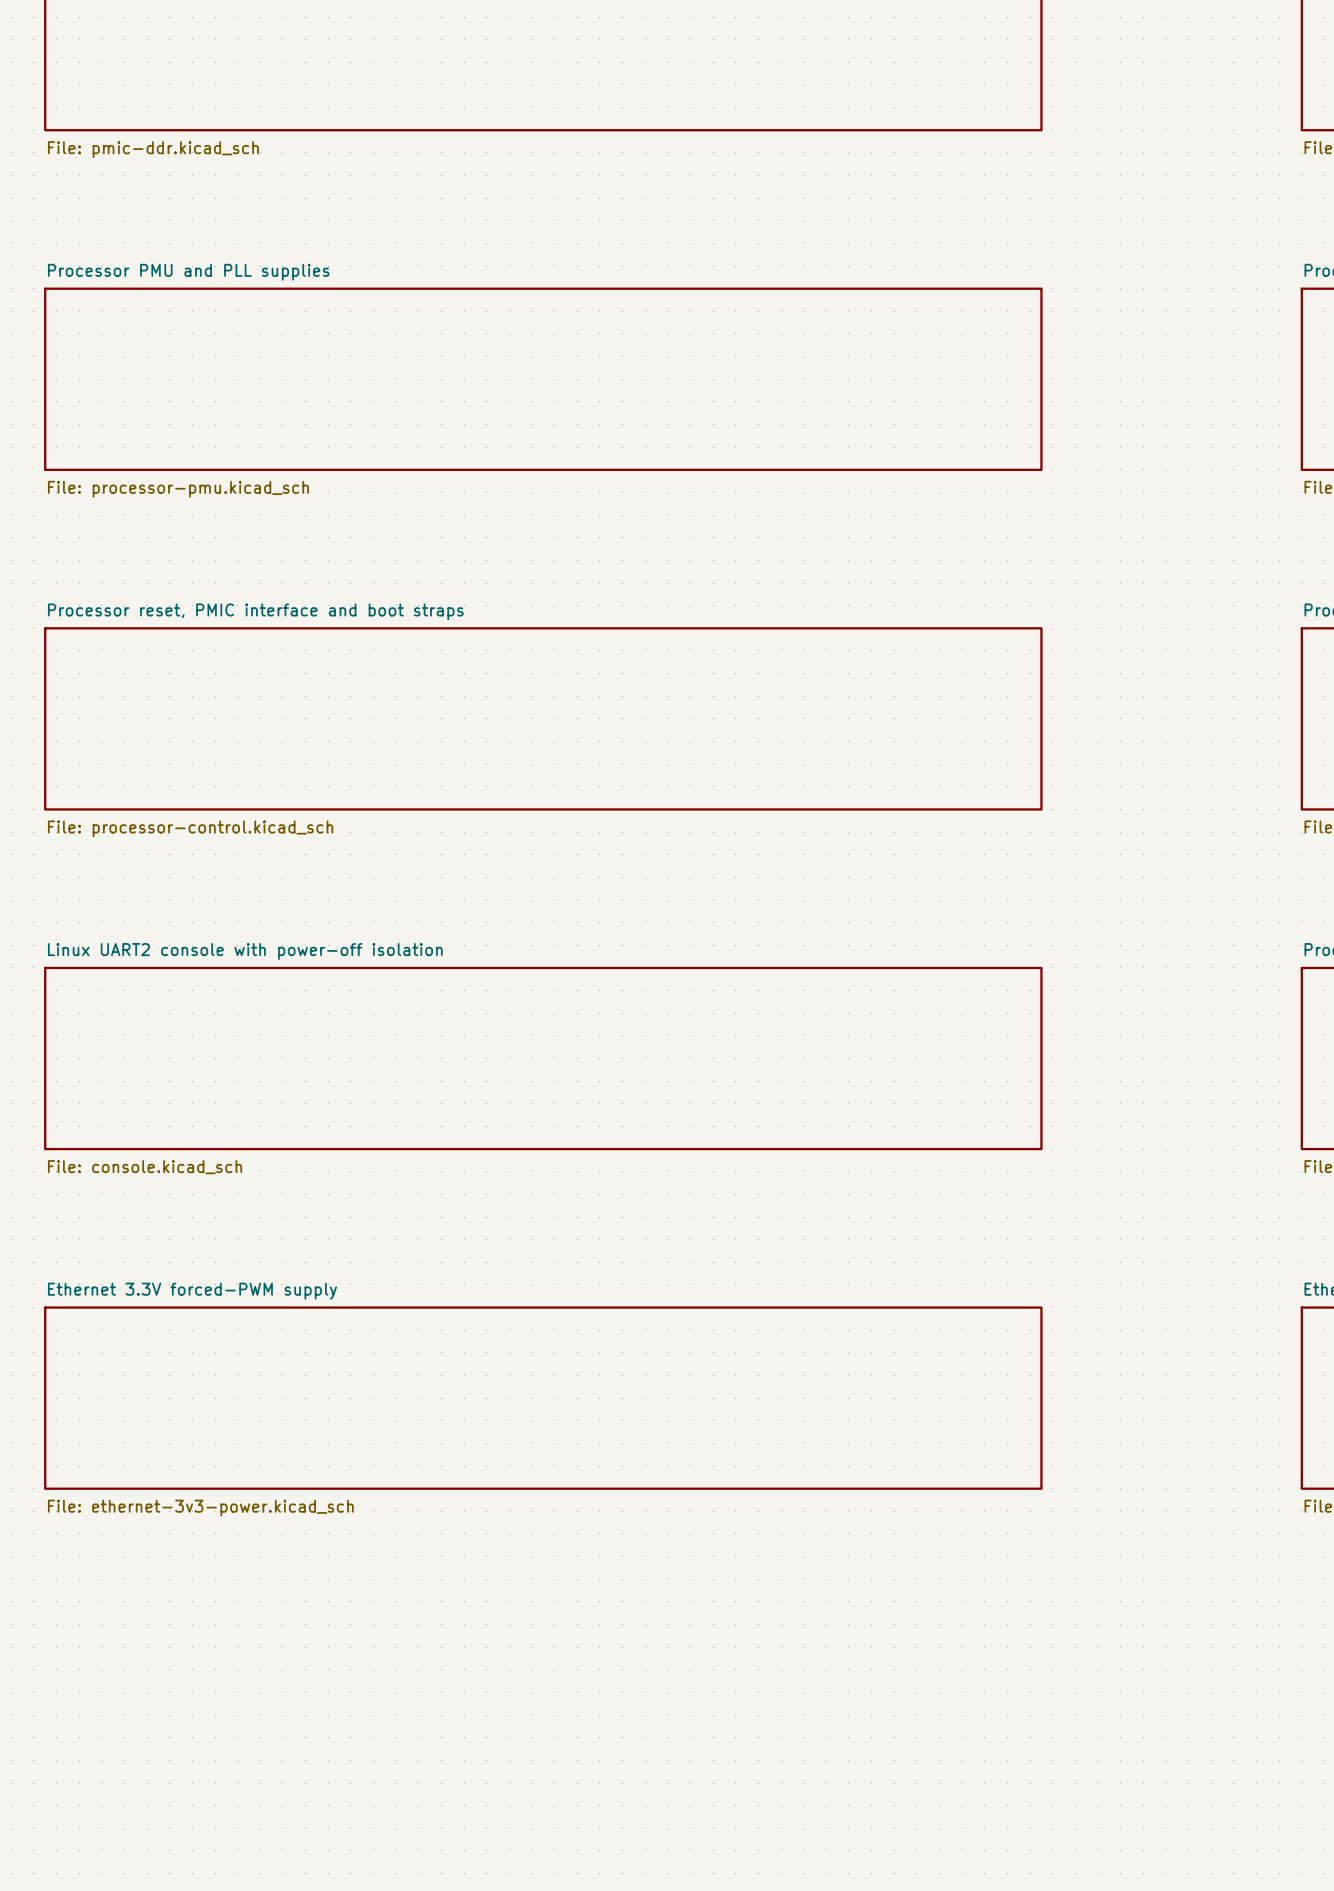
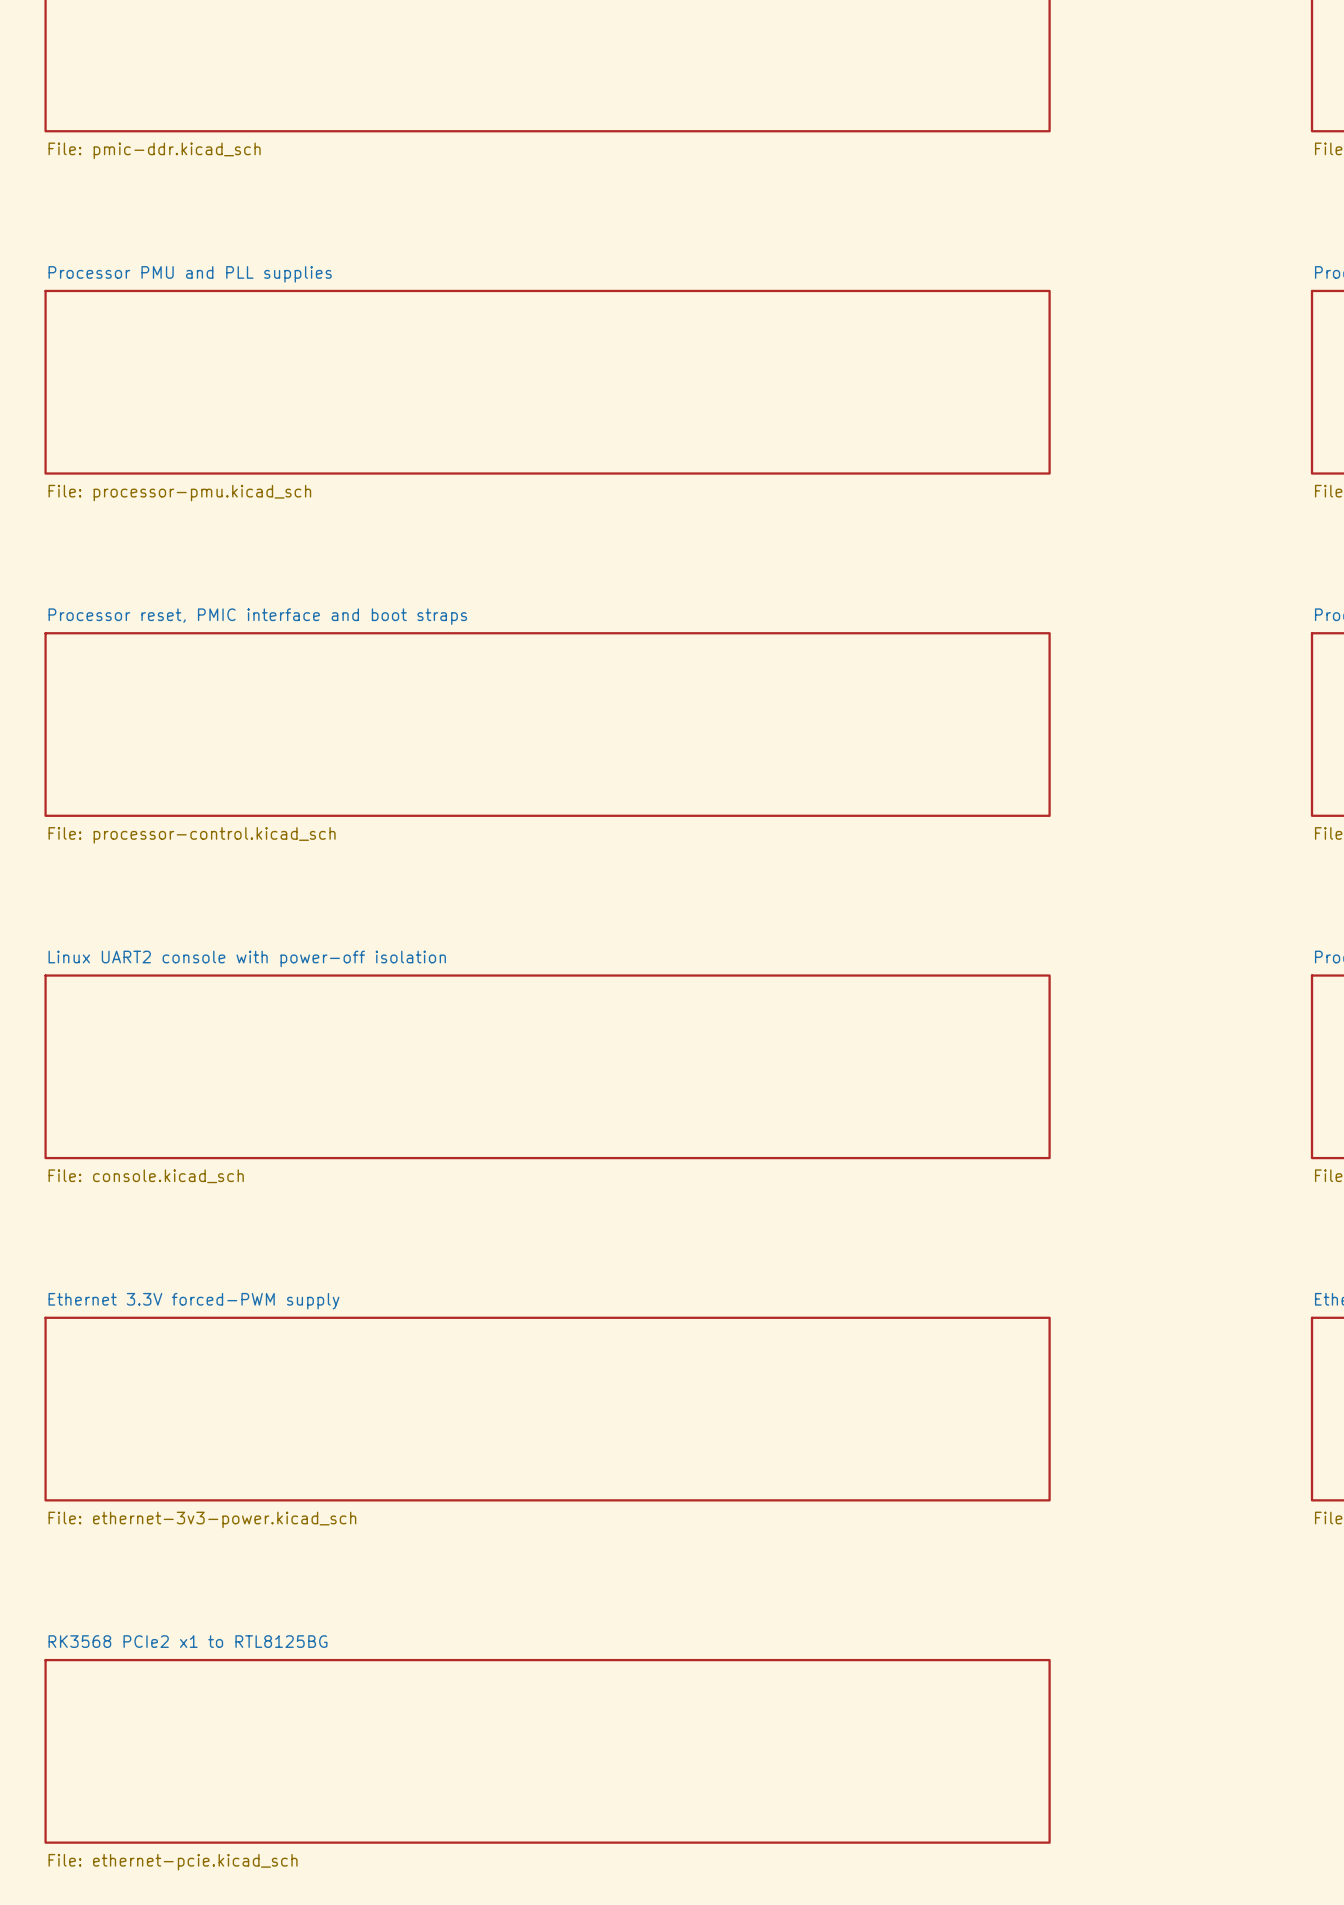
sheet RK3568 PCIe2 x1 to RTL8125BG: none -> File: ethernet-pcie.kicad_sch (547, 1751)

